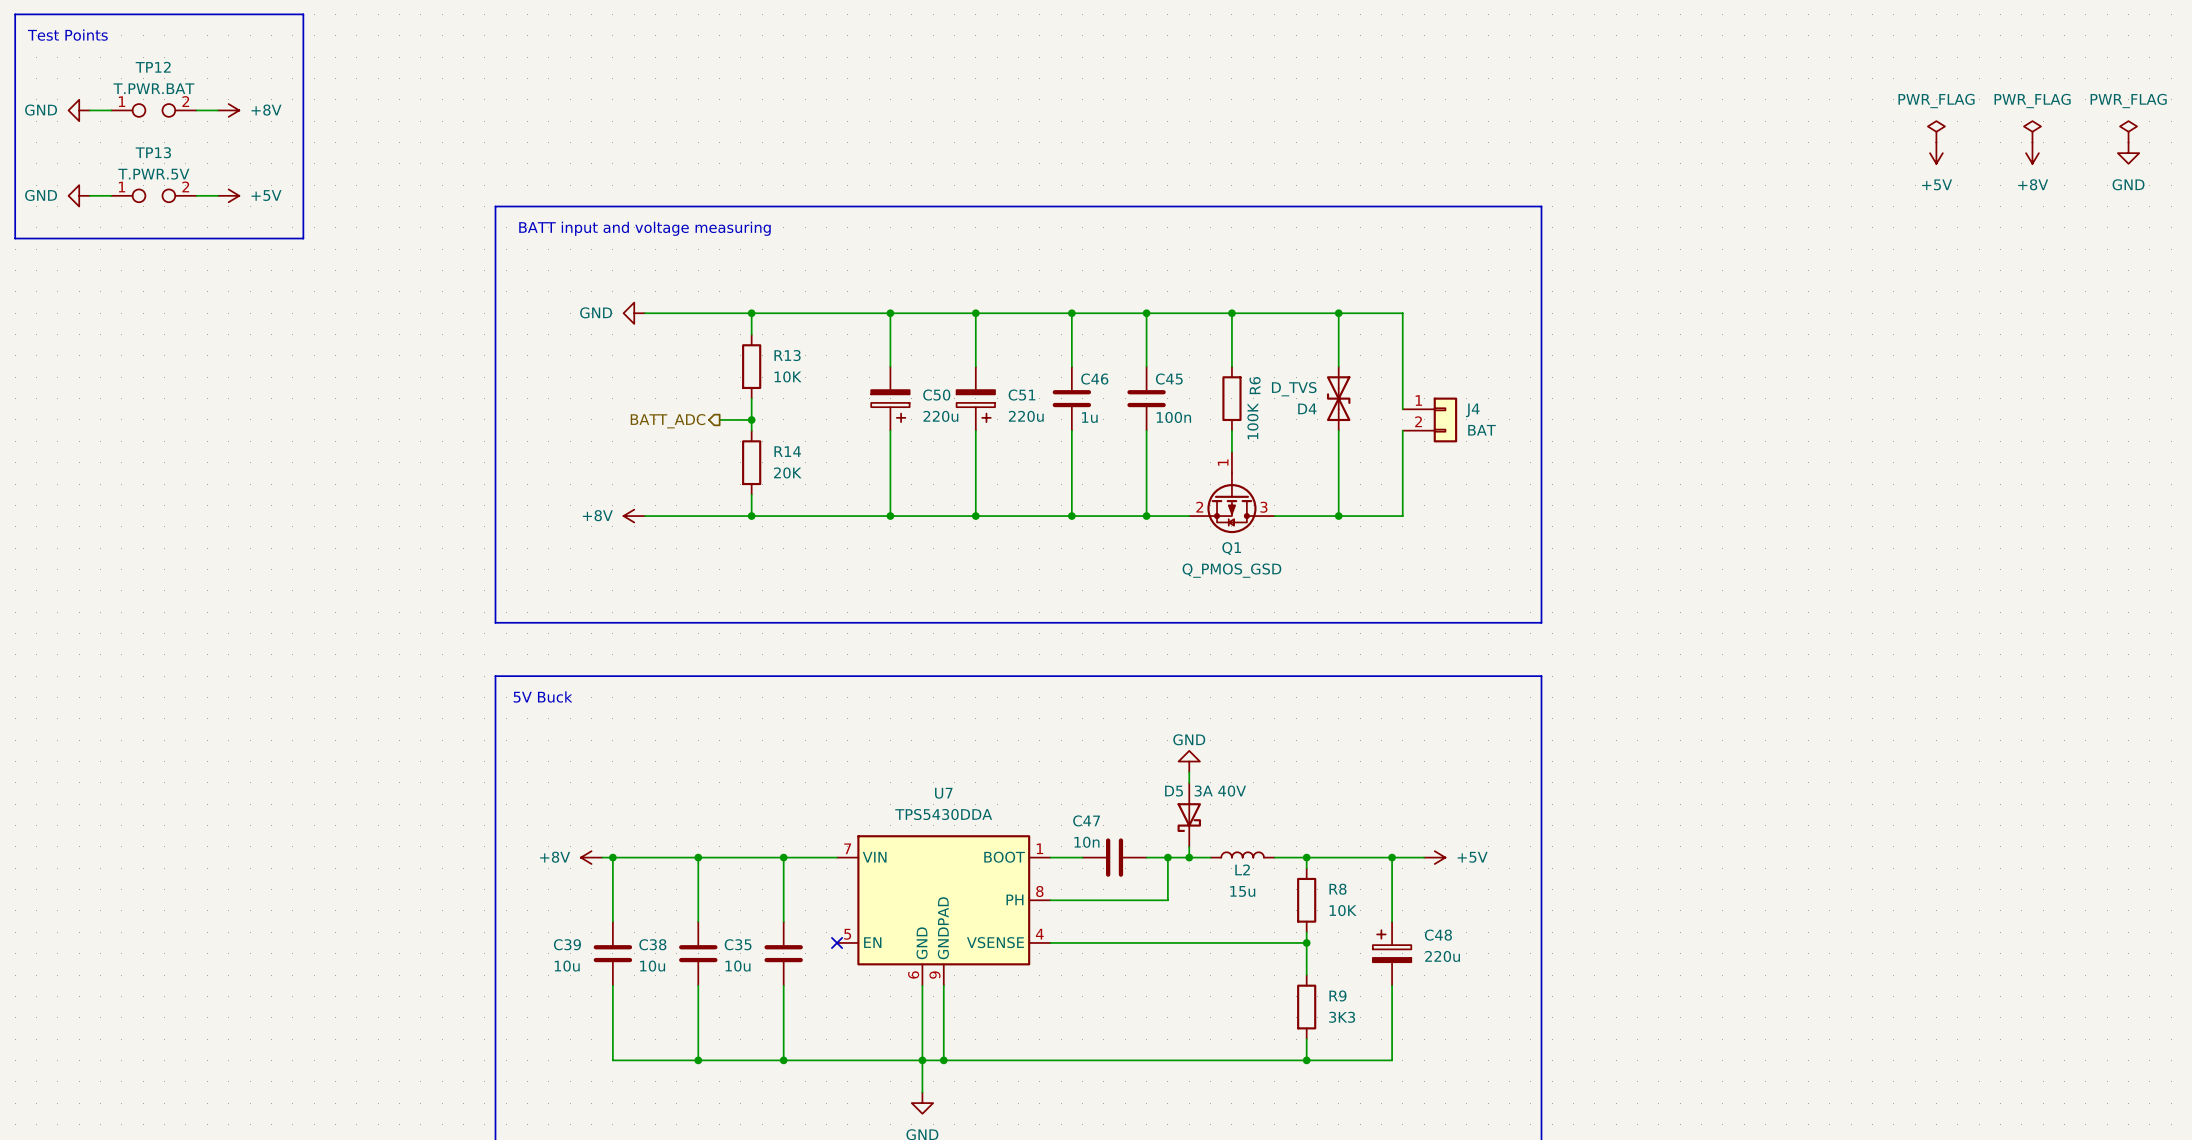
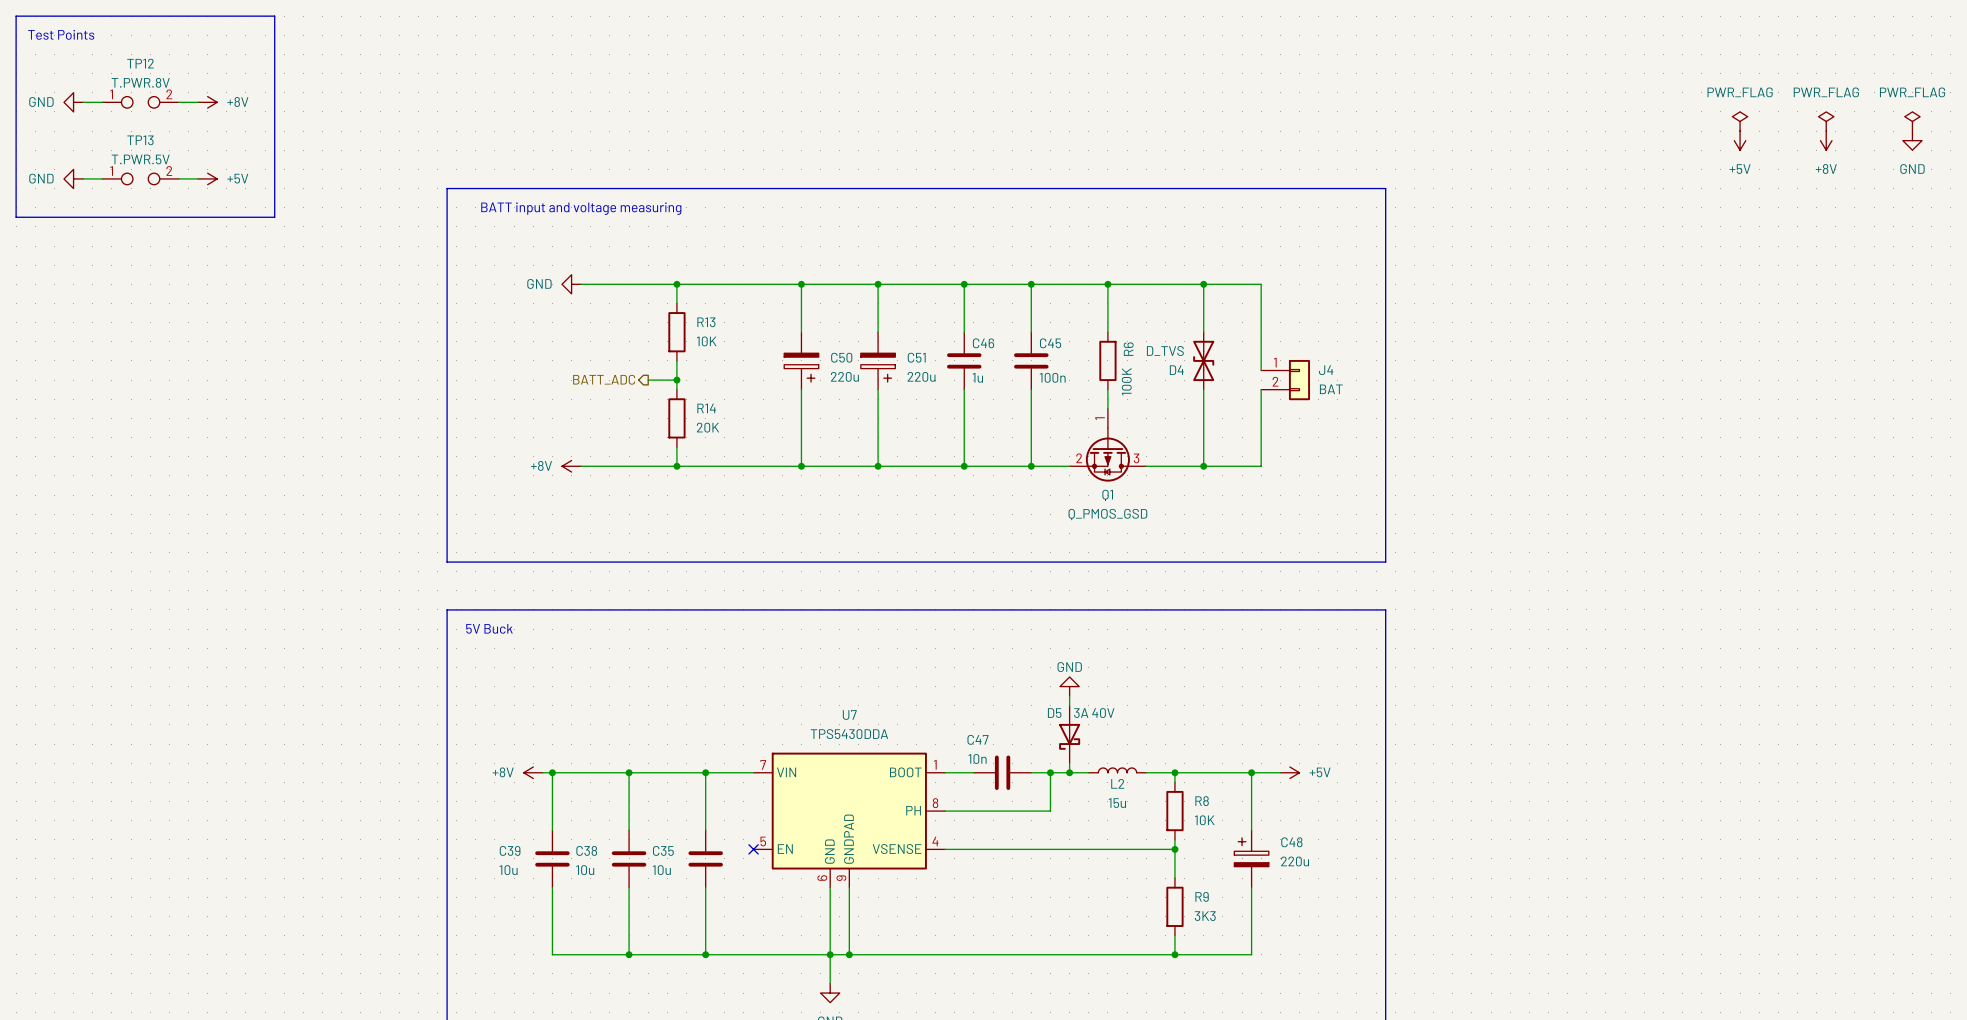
TP12 value: T.PWR.BAT (153, 88) -> T.PWR.8V (140, 82)

